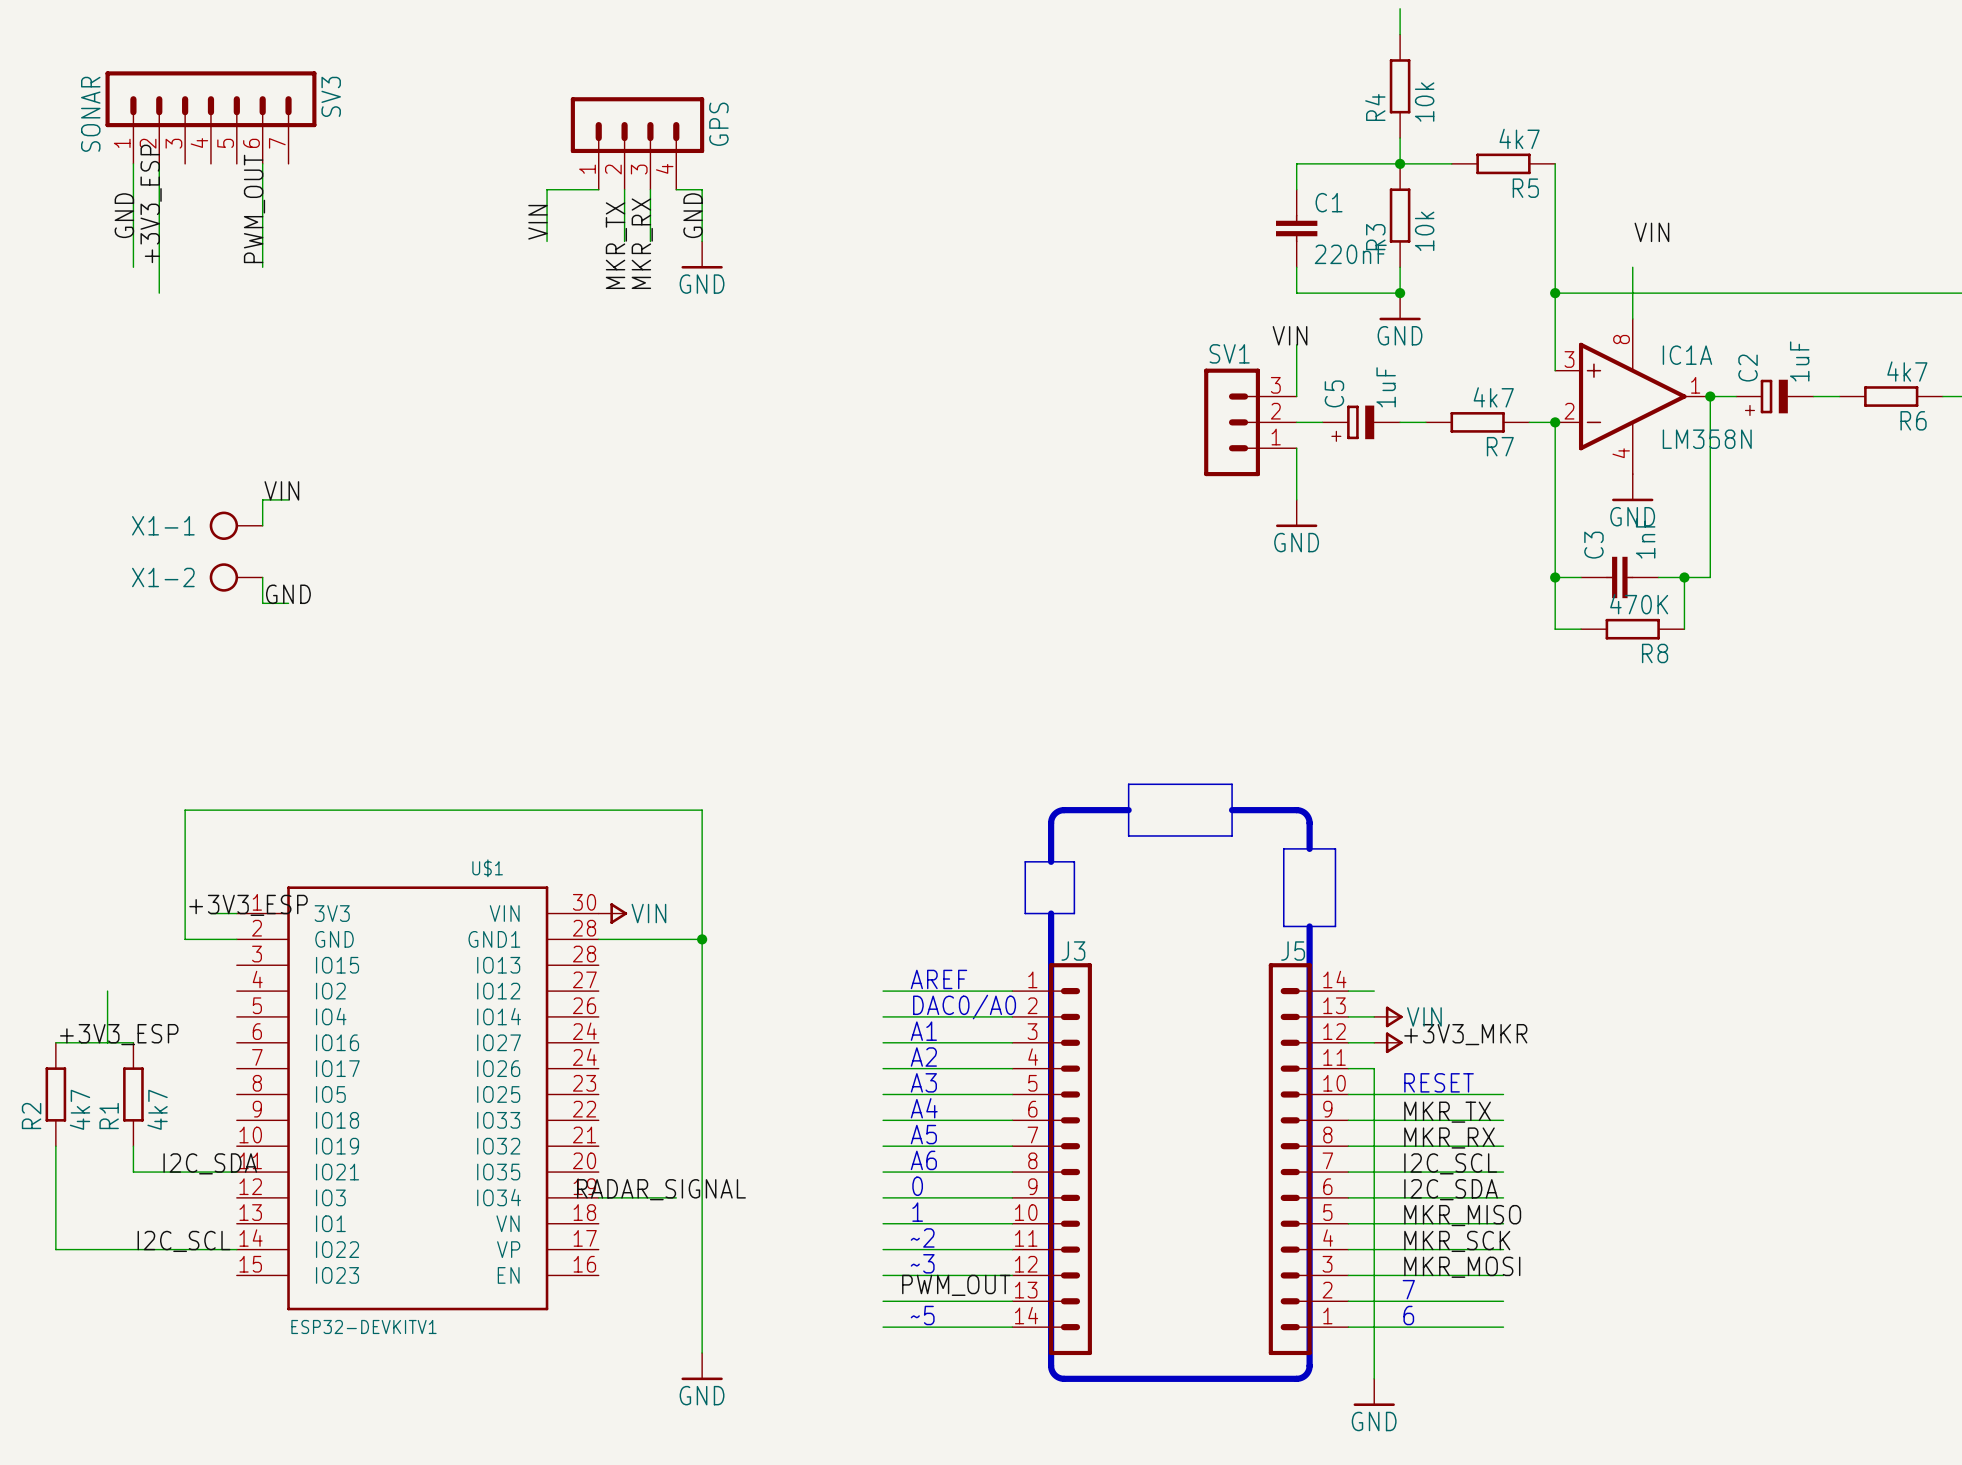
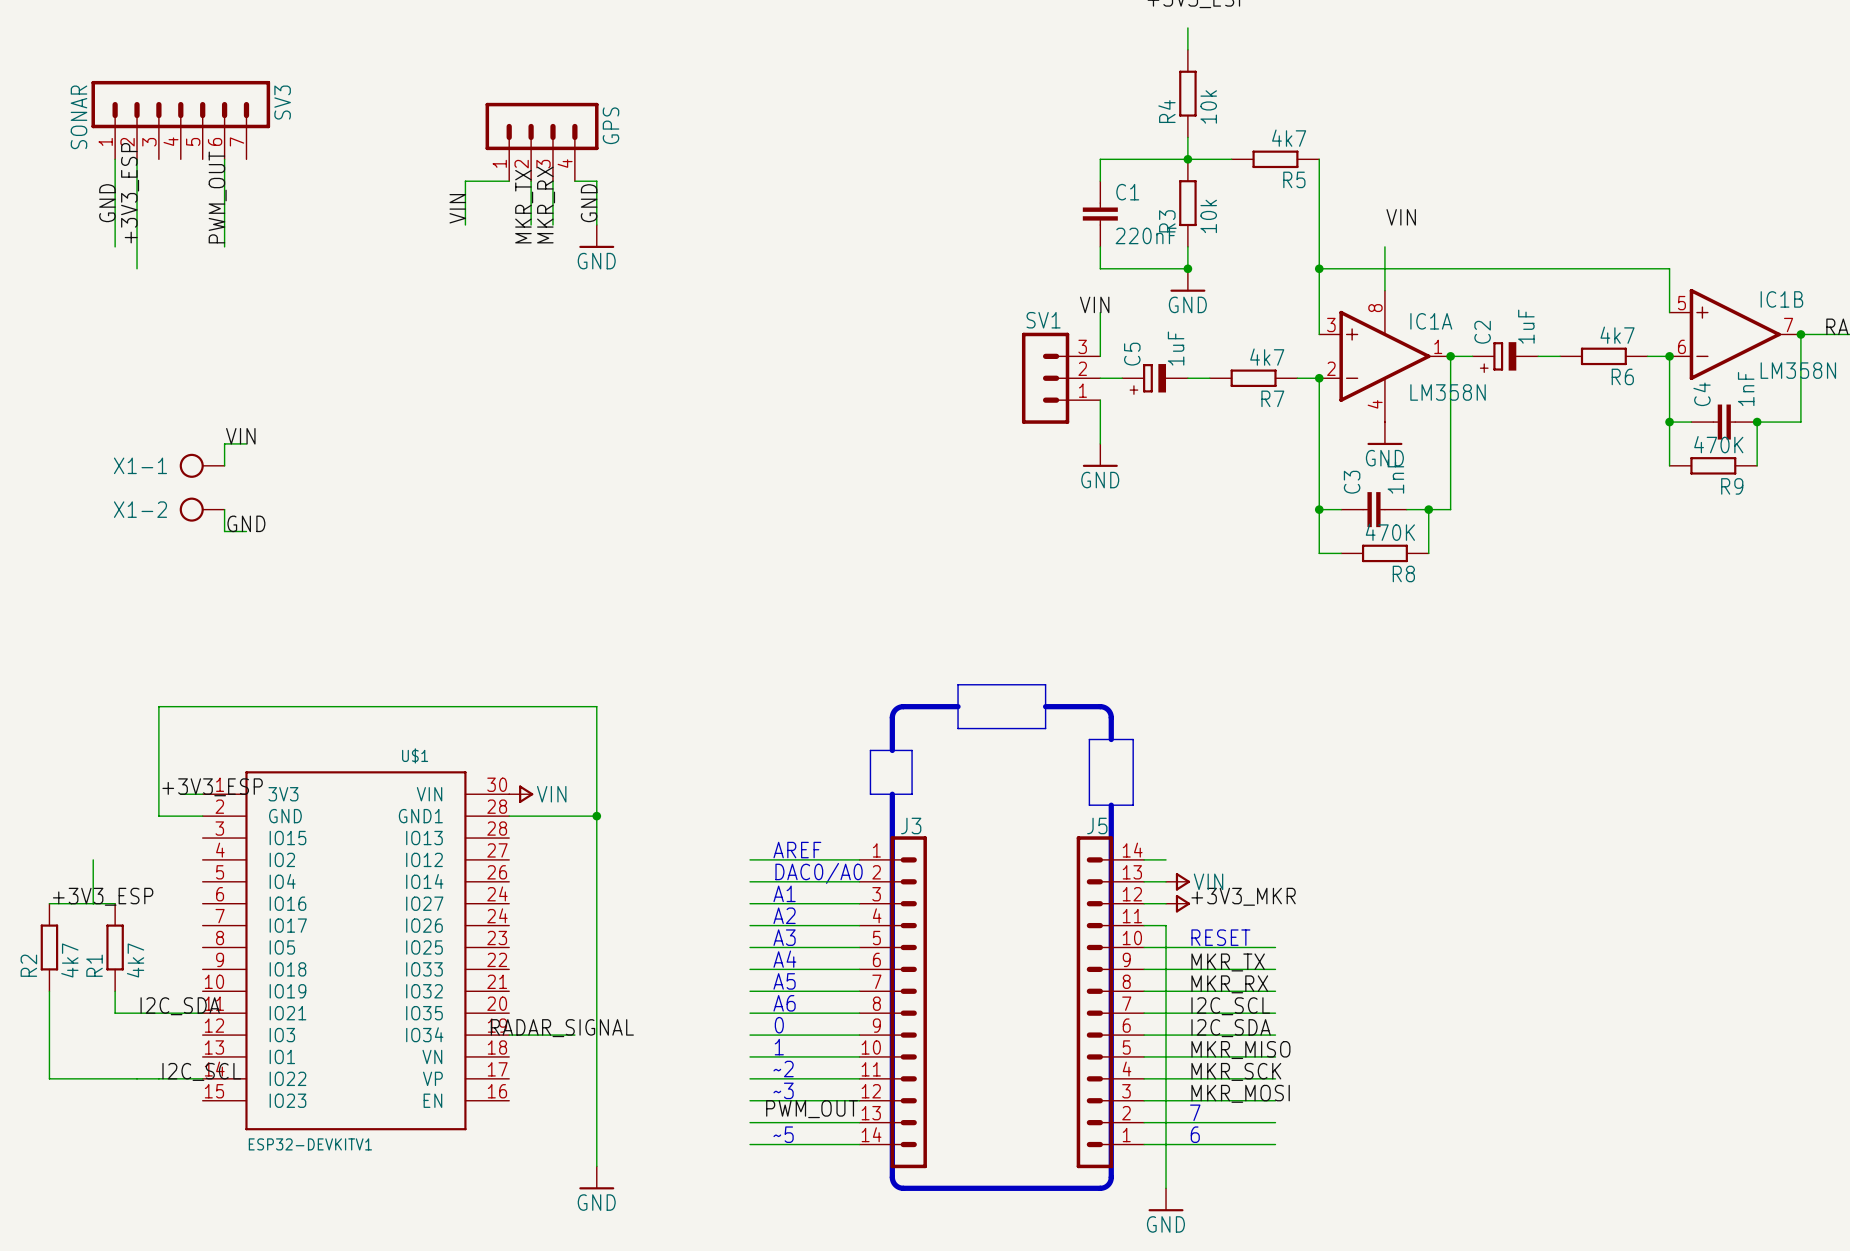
label position: MKR_RX (642, 243) -> MKR_RX (546, 205)
label position: MKR_TX (616, 245) -> MKR_TX (524, 206)
label position: I2C_SCL (184, 1241) -> I2C_SCL (201, 1071)

